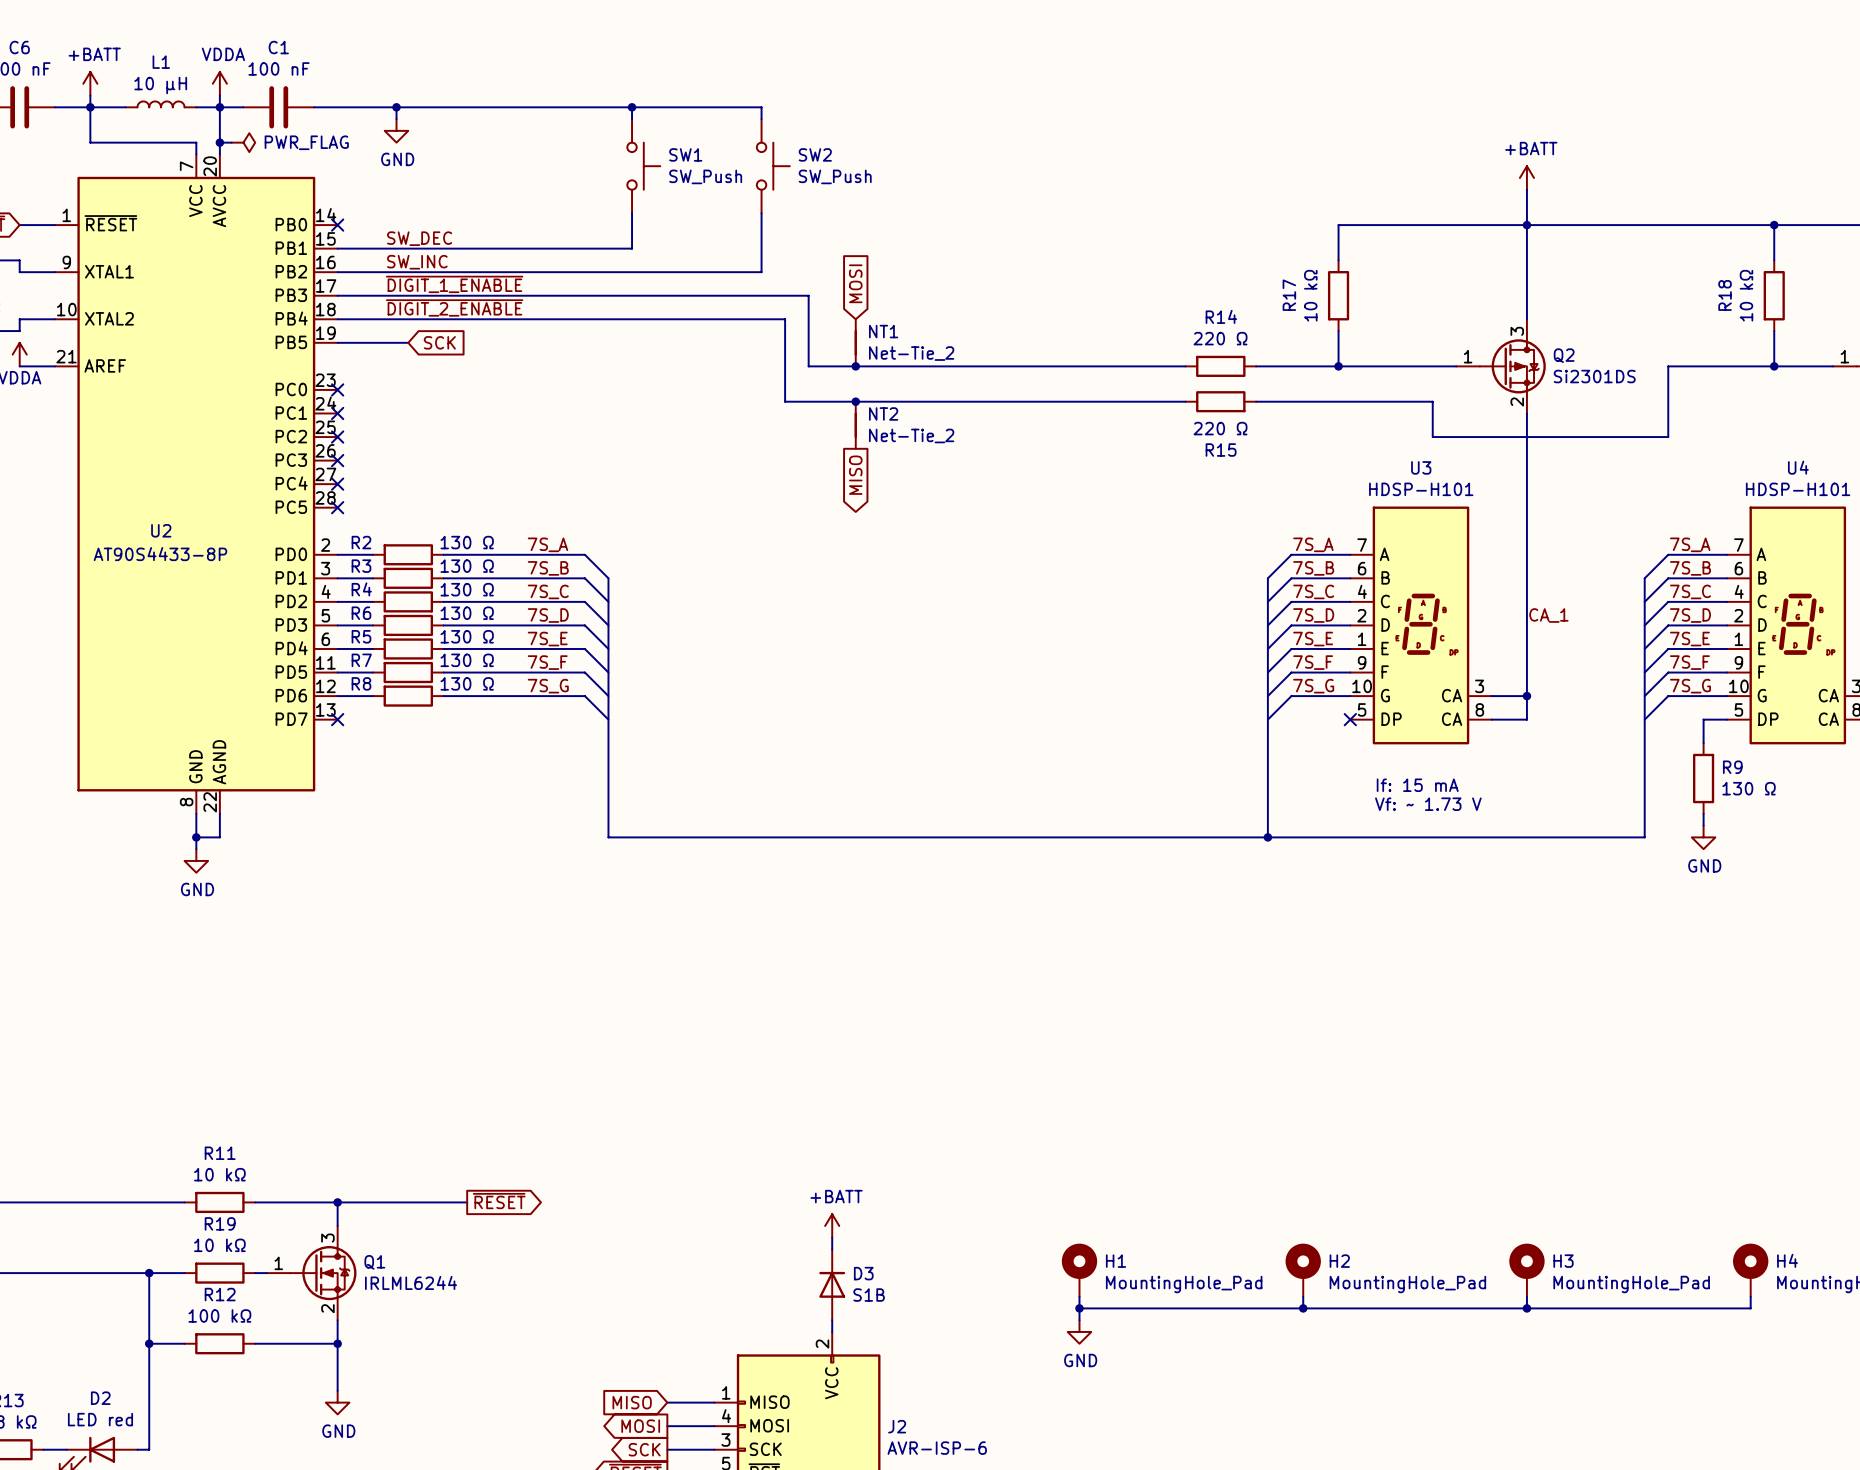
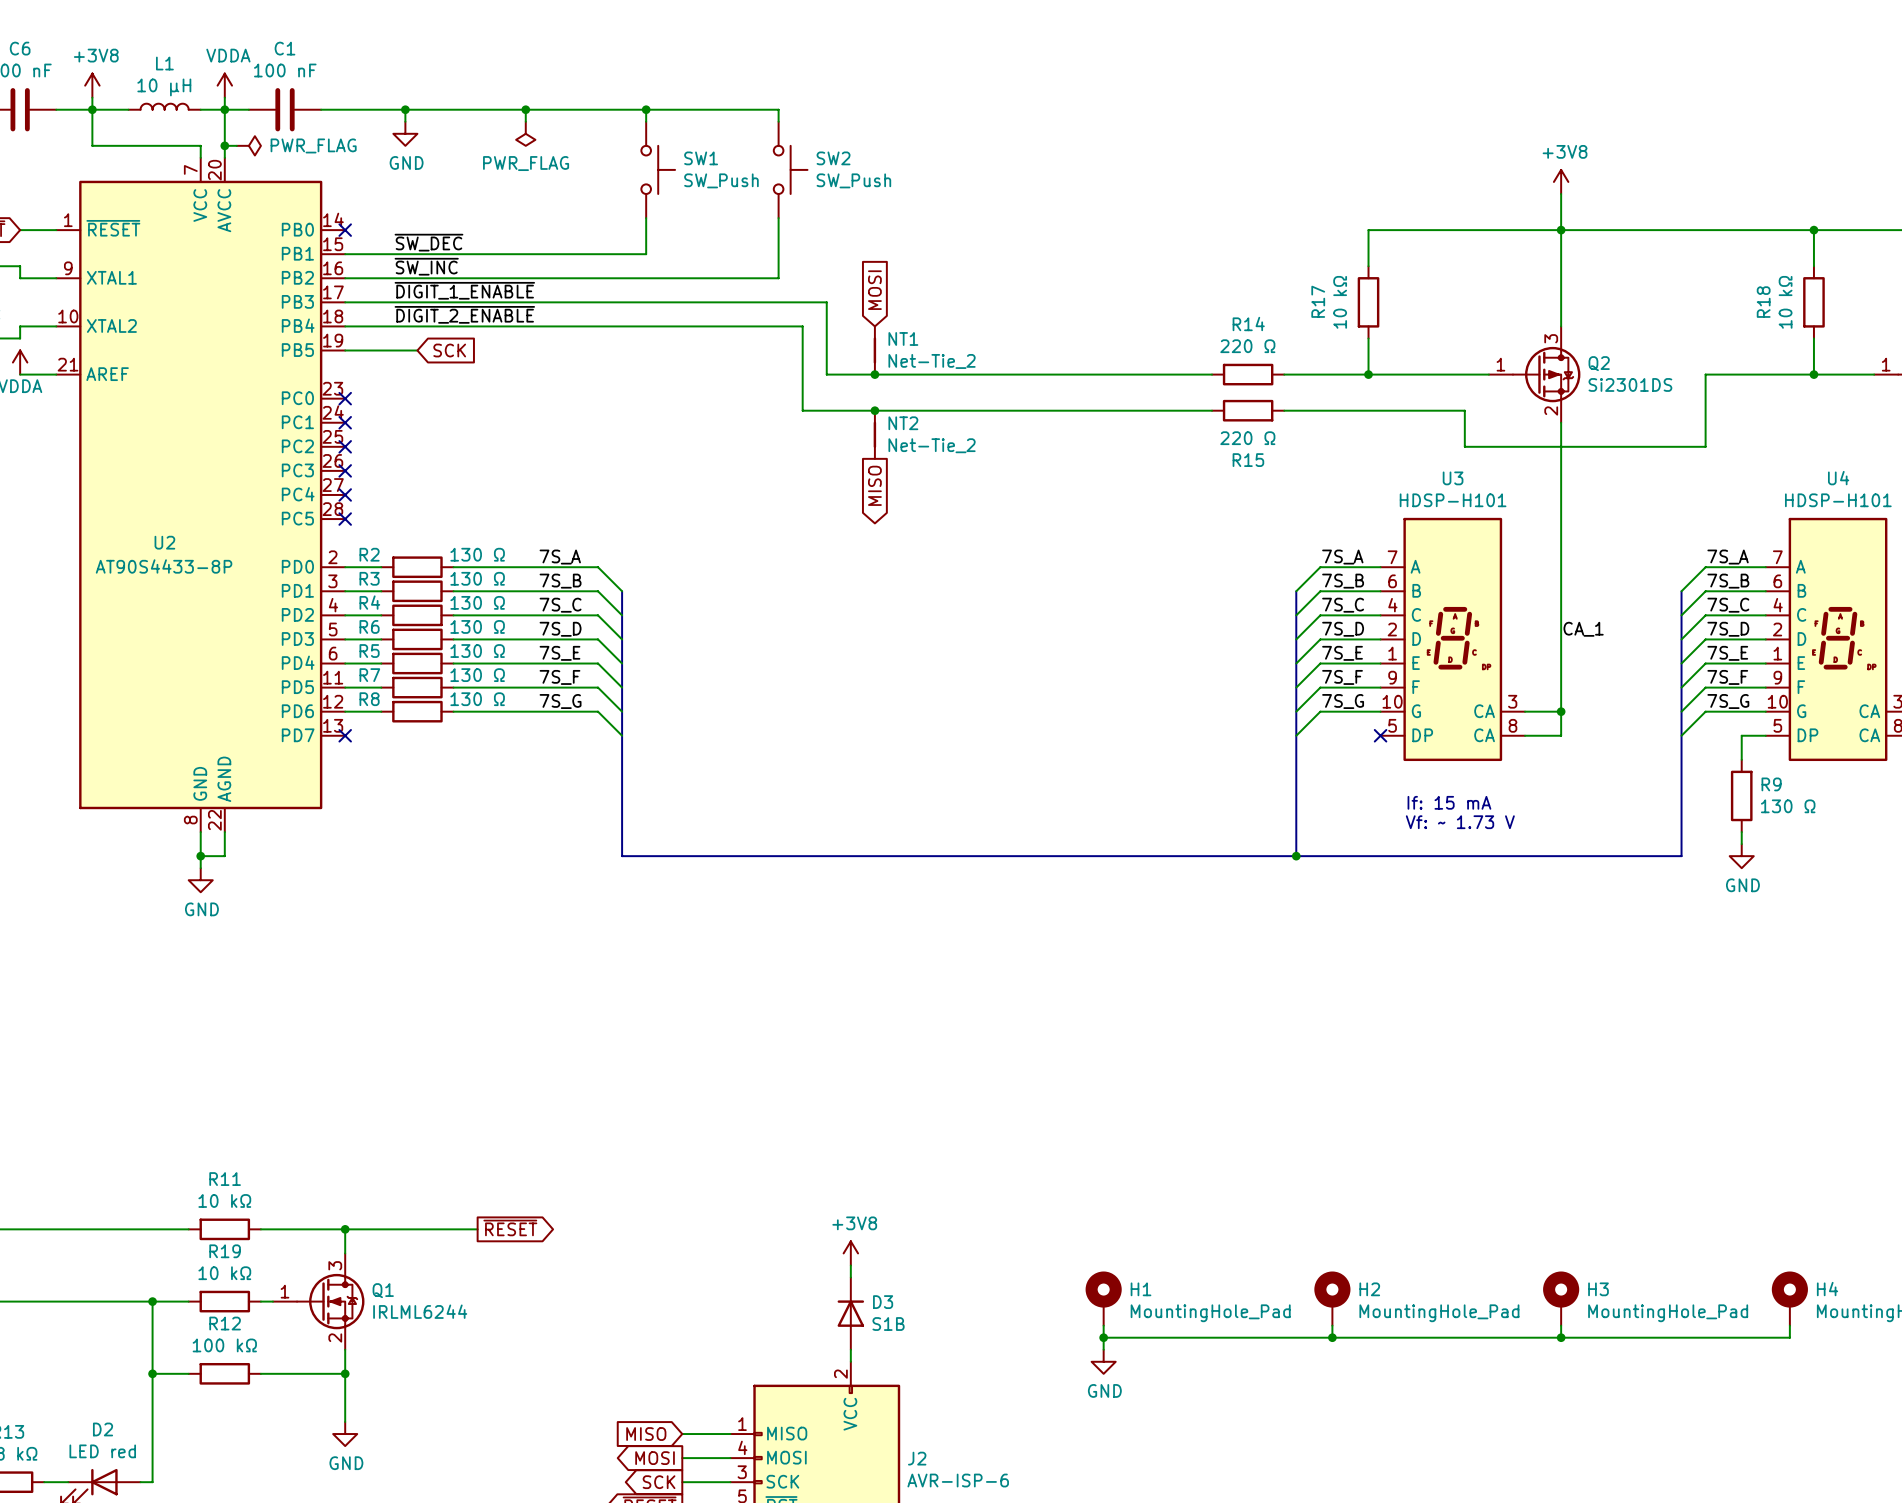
power symbol: +BATT (90, 83) -> +3V8 (92, 85)
wire: none -> (525, 109) (525, 121)
junction: none -> (525, 109)
power symbol: none -> PWR_FLAG (525, 133)
power symbol: +BATT (1526, 177) -> +3V8 (1561, 181)
label: SW_DEC (419, 238) -> ~{SW_DEC} (428, 242)
label: SW_INC (417, 262) -> ~{SW_INC} (426, 266)
power symbol: +BATT (832, 1225) -> +3V8 (850, 1253)

